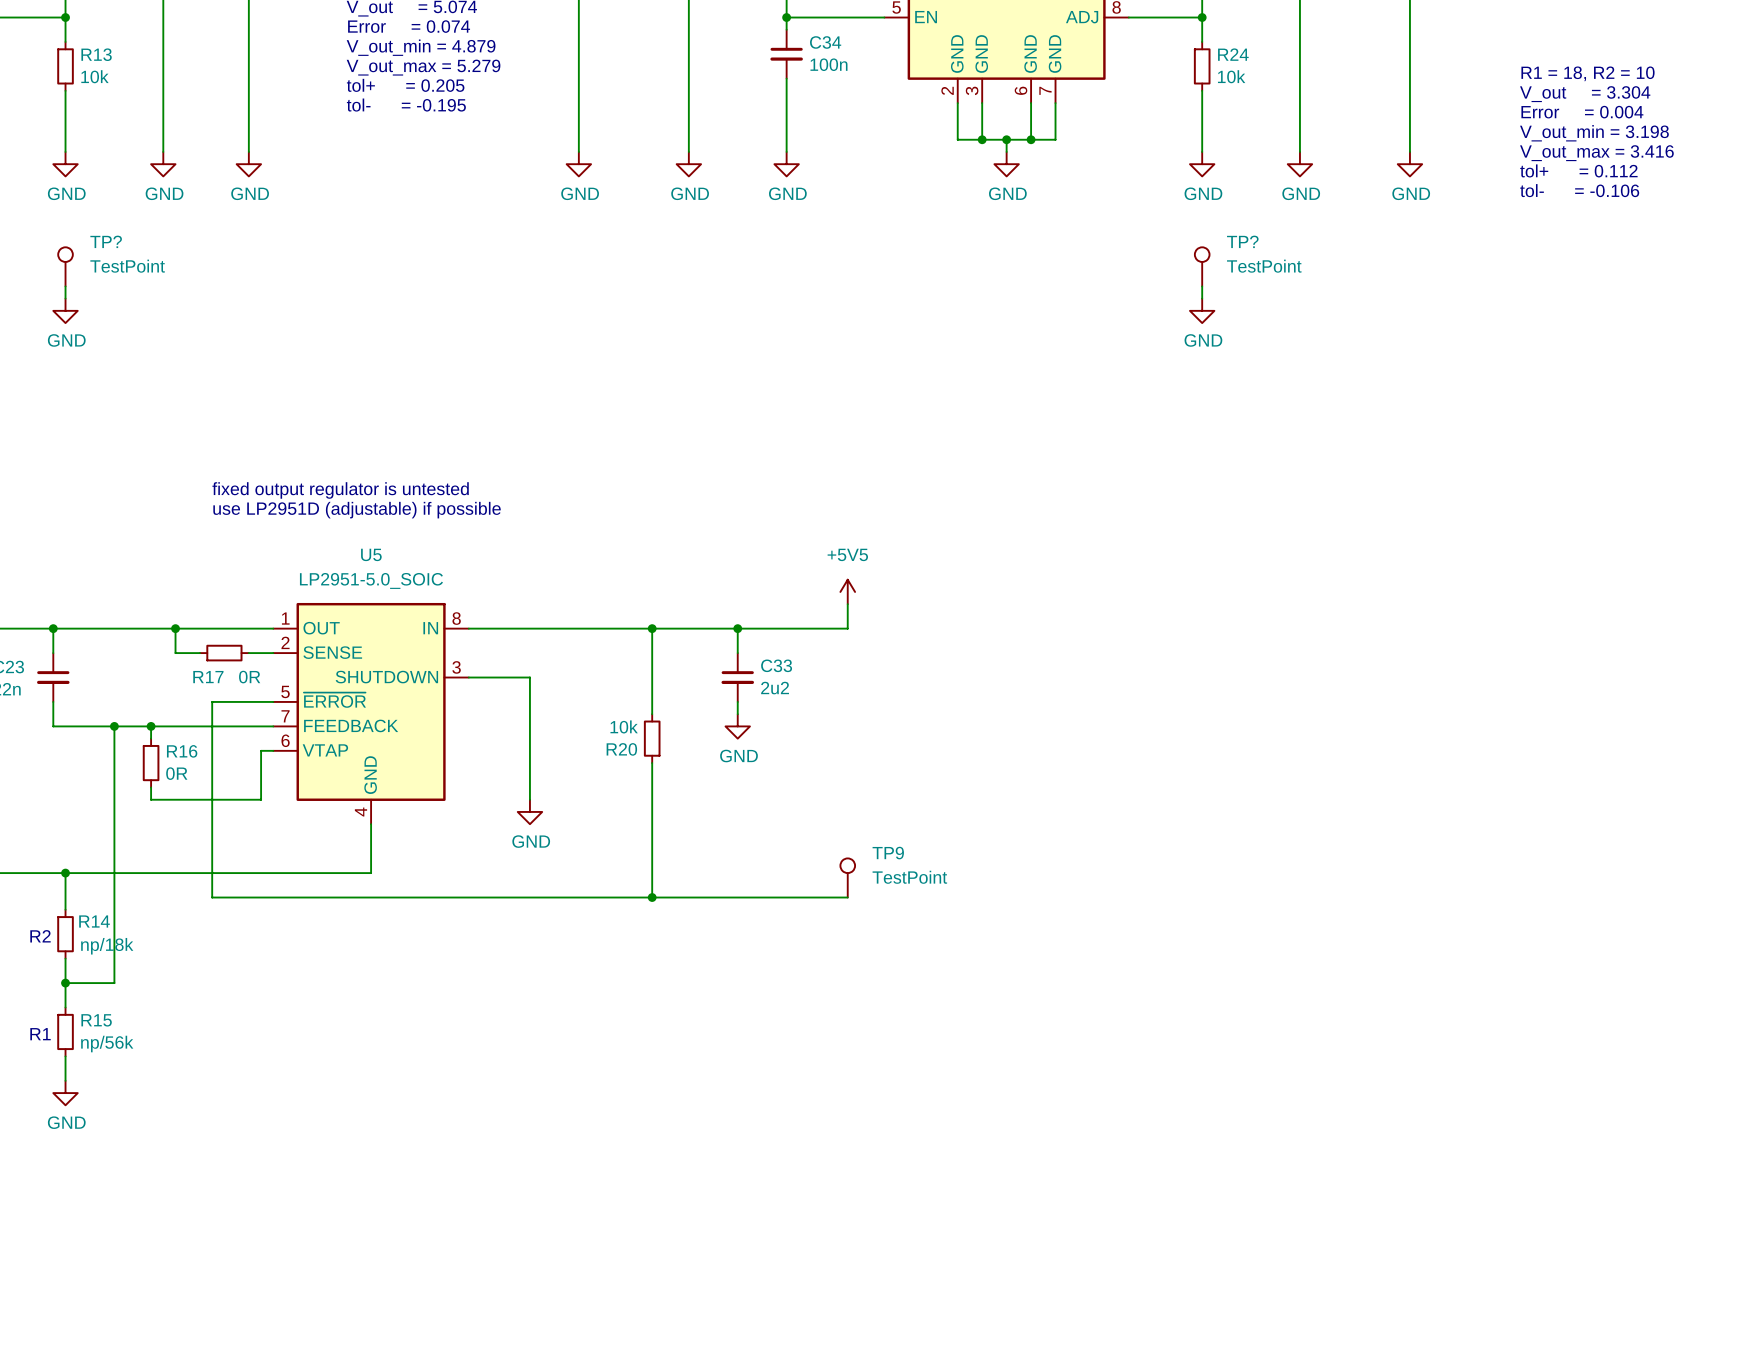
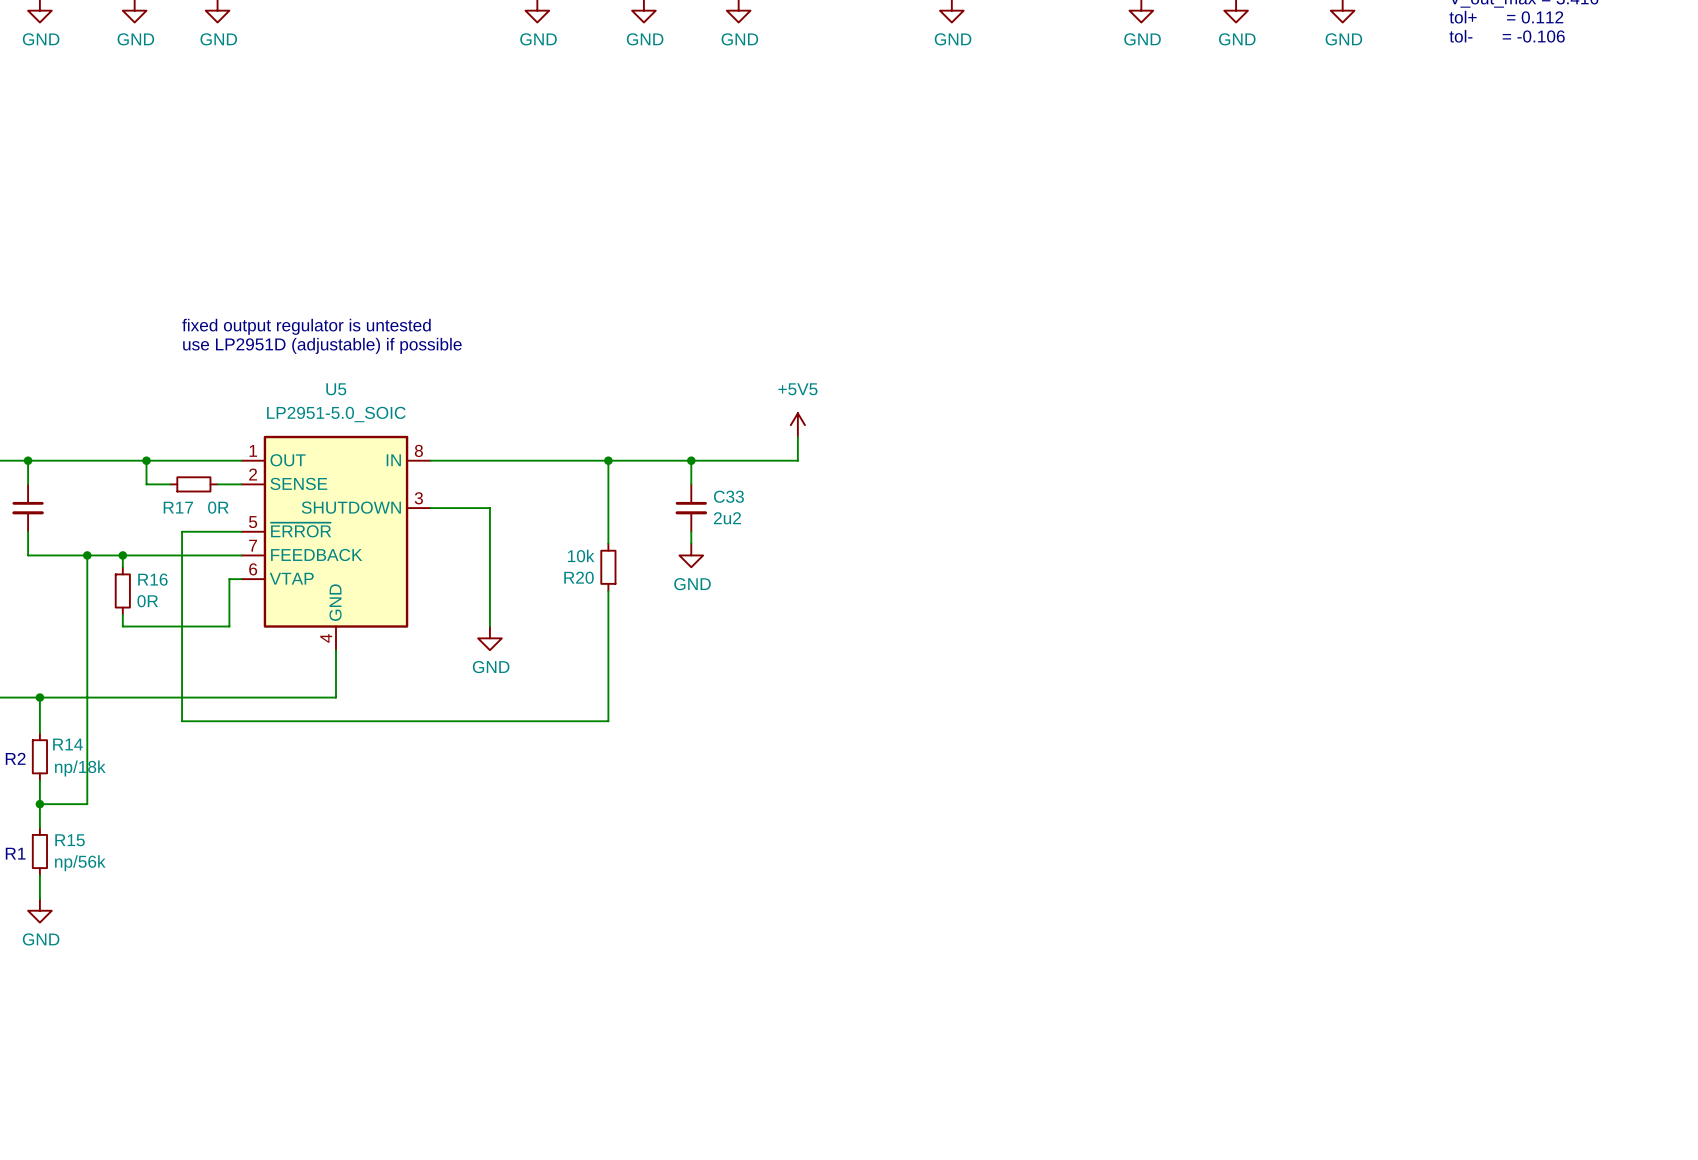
TP?: TestPoint (65, 266) -> none
TP?: TestPoint (1202, 266) -> none
wire: (65, 286) (65, 298) -> none
wire: (1202, 286) (1202, 298) -> none
power symbol: GND (65, 310) -> none
power symbol: GND (1202, 310) -> none
TP9: TestPoint (847, 877) -> none
wire: (652, 897) (847, 897) -> none
junction: (652, 897) -> none

